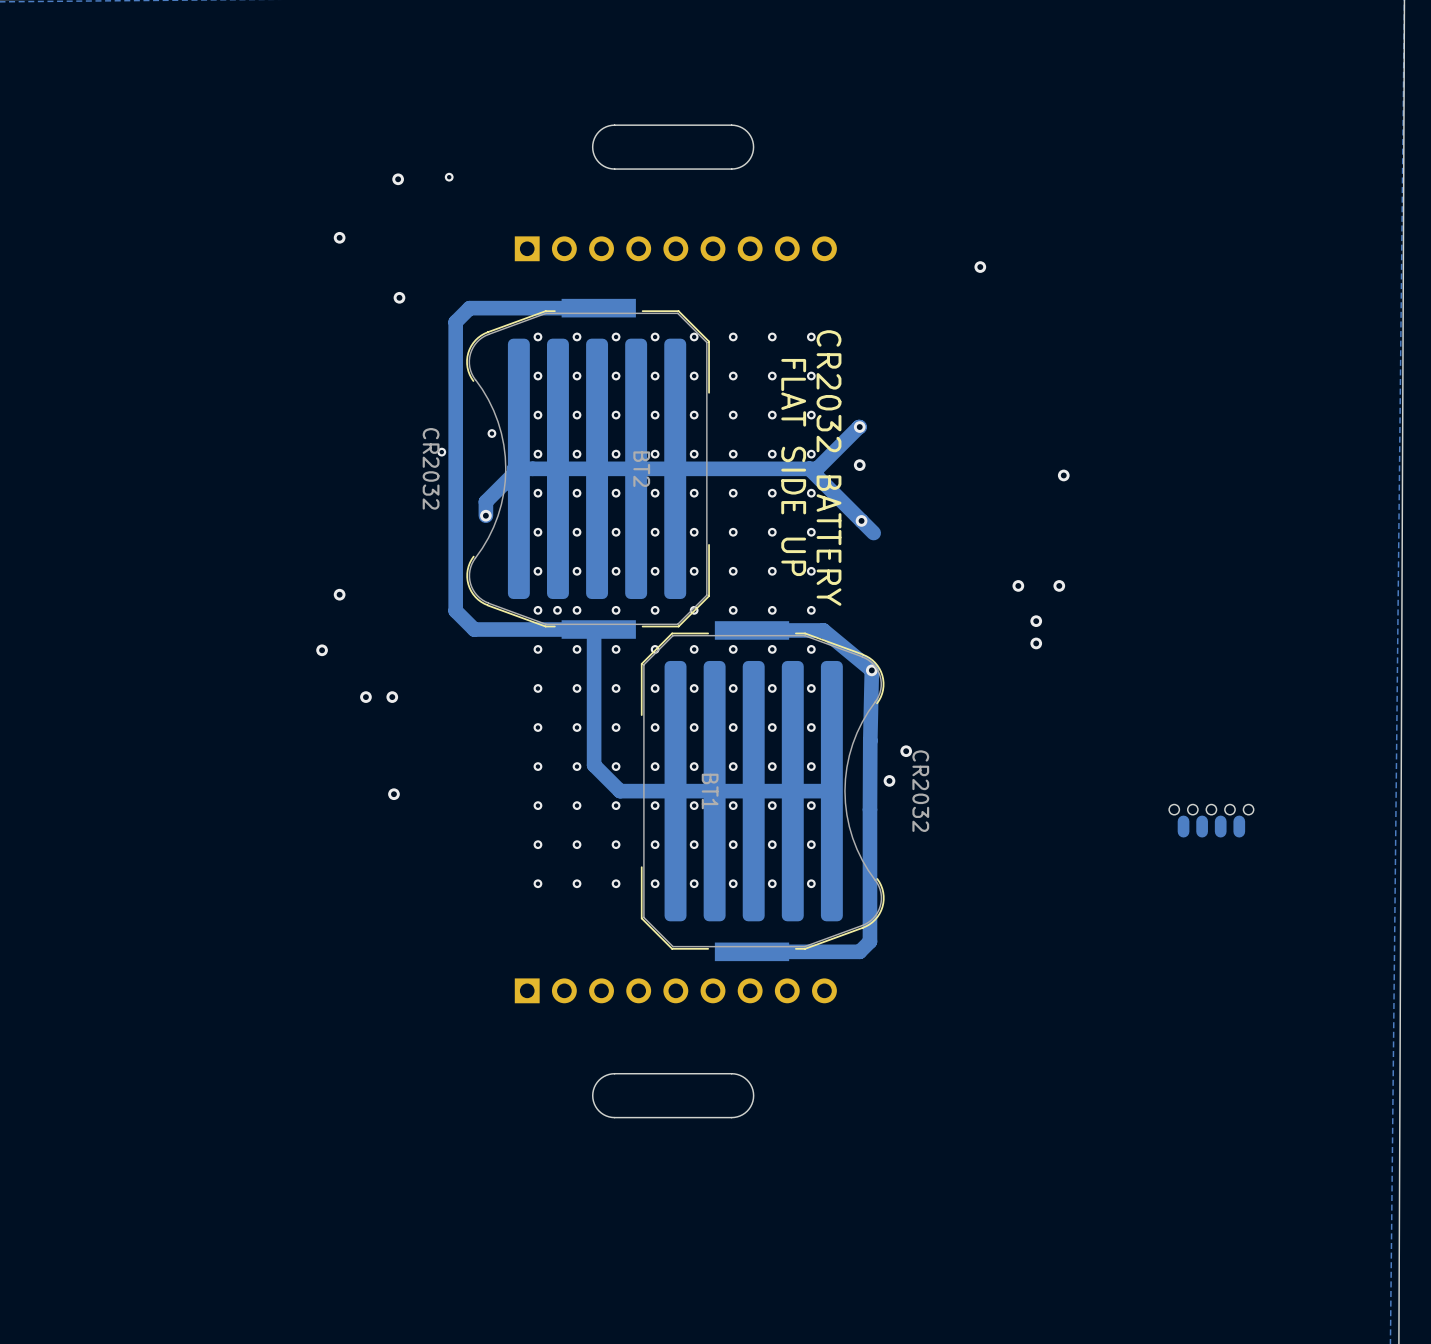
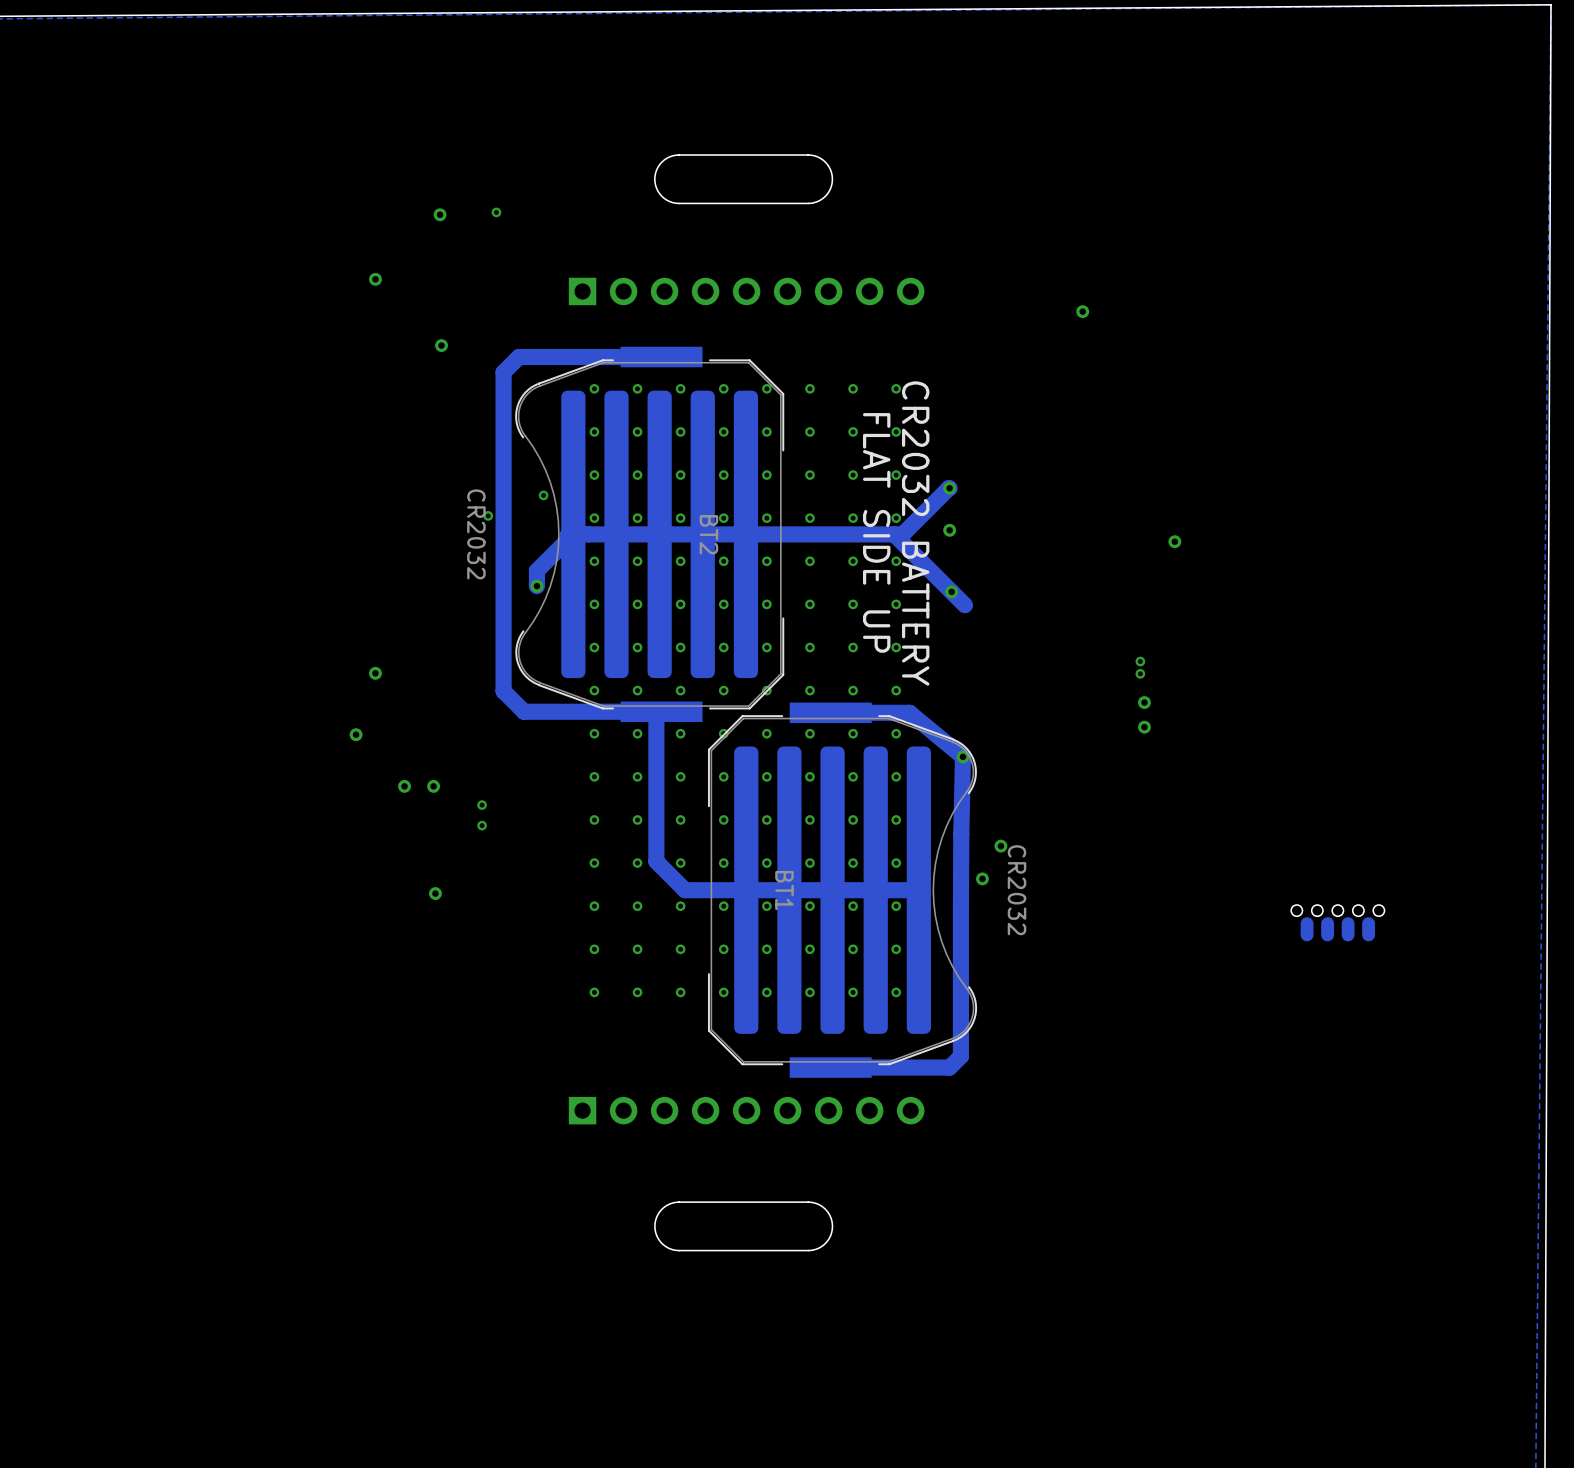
via: none -> (1140, 661)
via: (1018, 585) -> none
via: (1059, 585) -> none
via: none -> (1140, 673)
via: (557, 610) -> none
via: none -> (482, 805)
via: none -> (482, 825)

